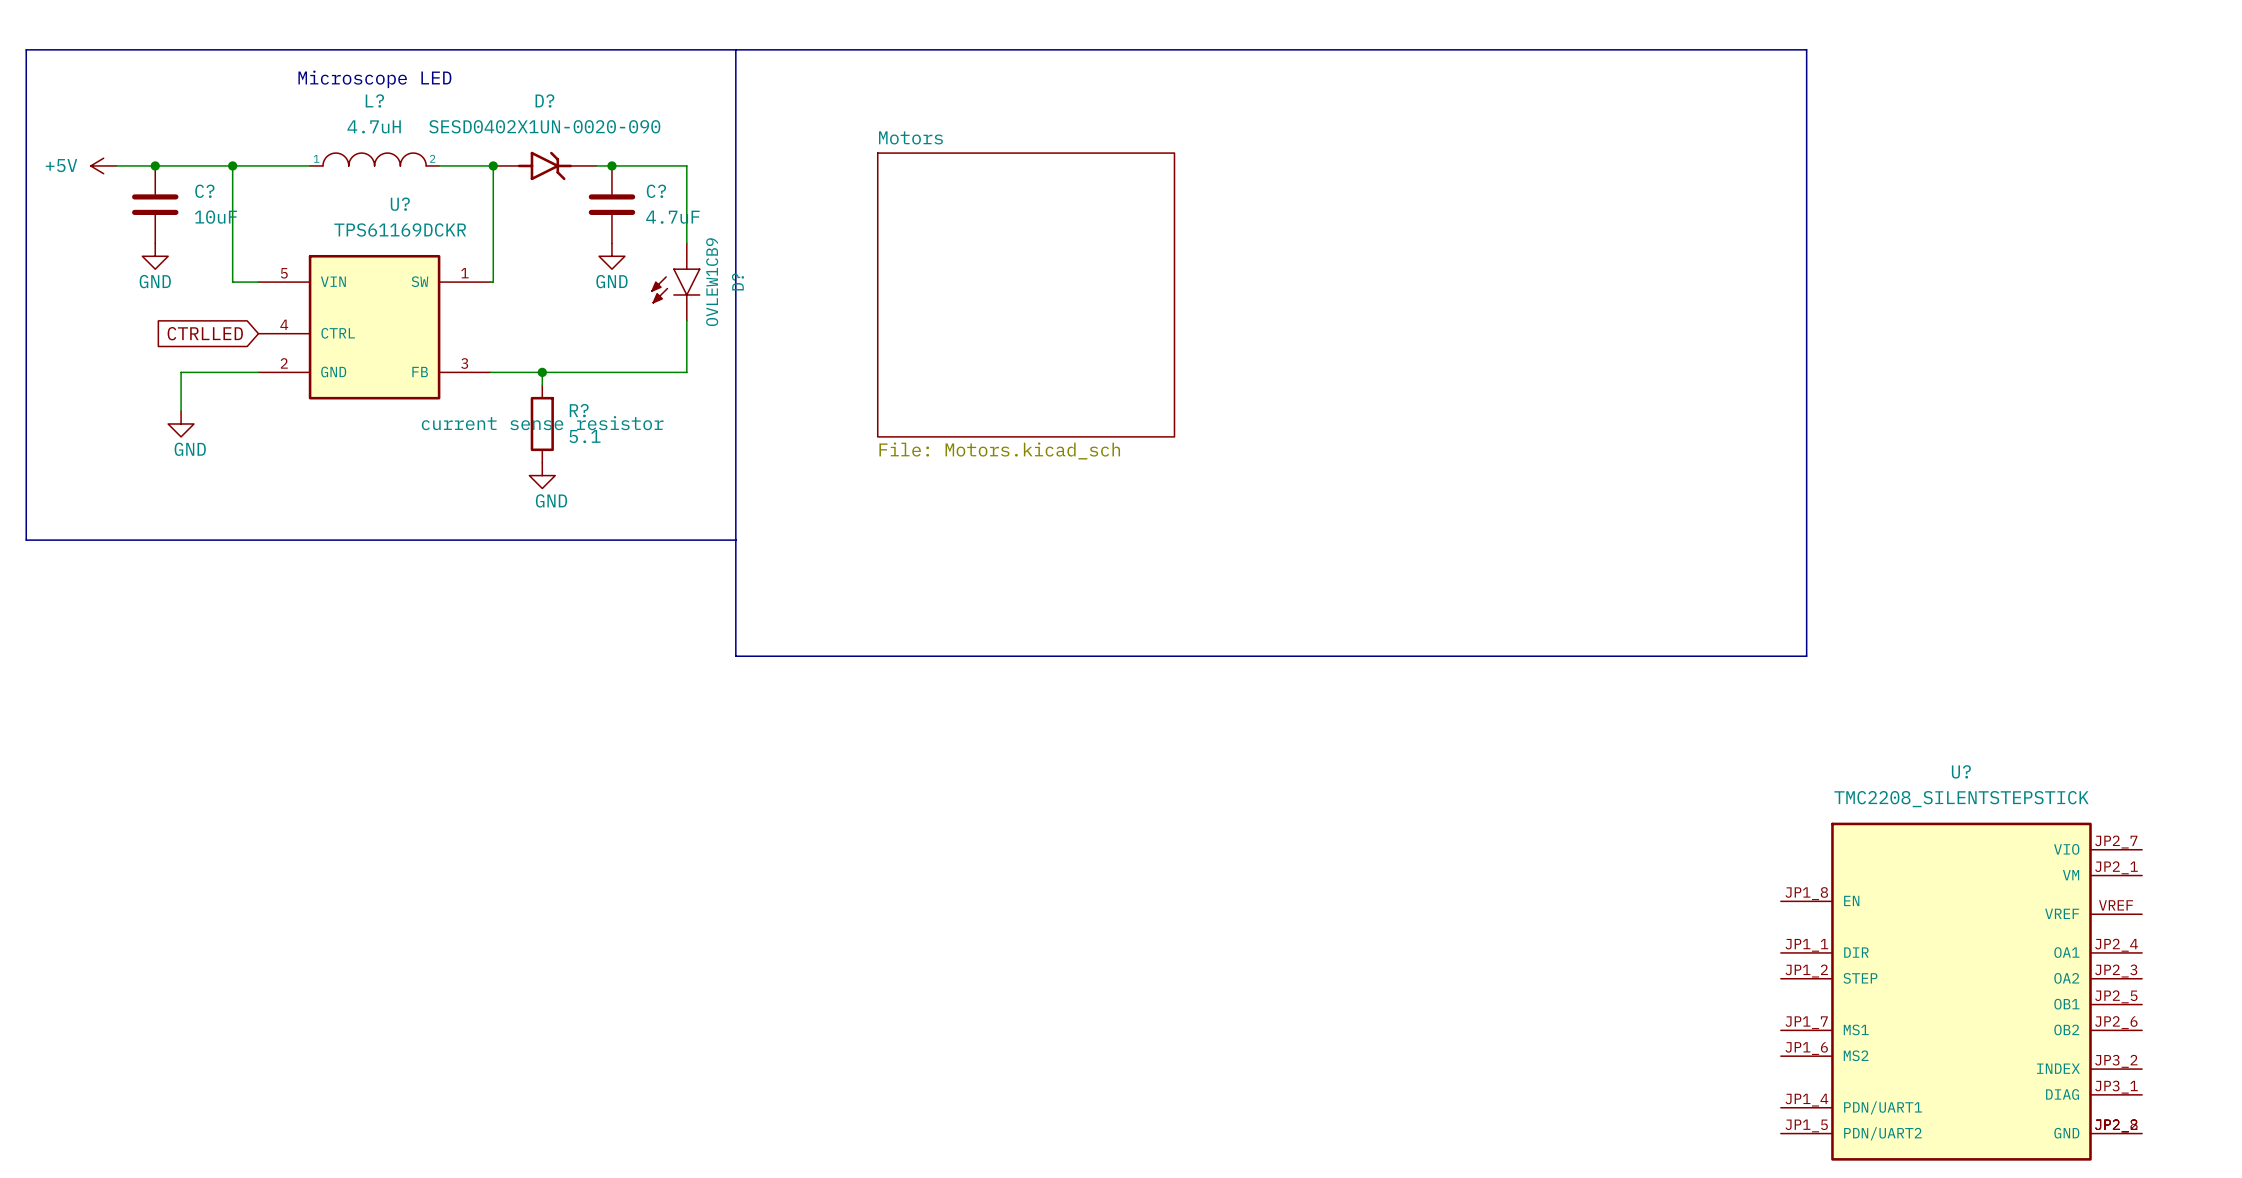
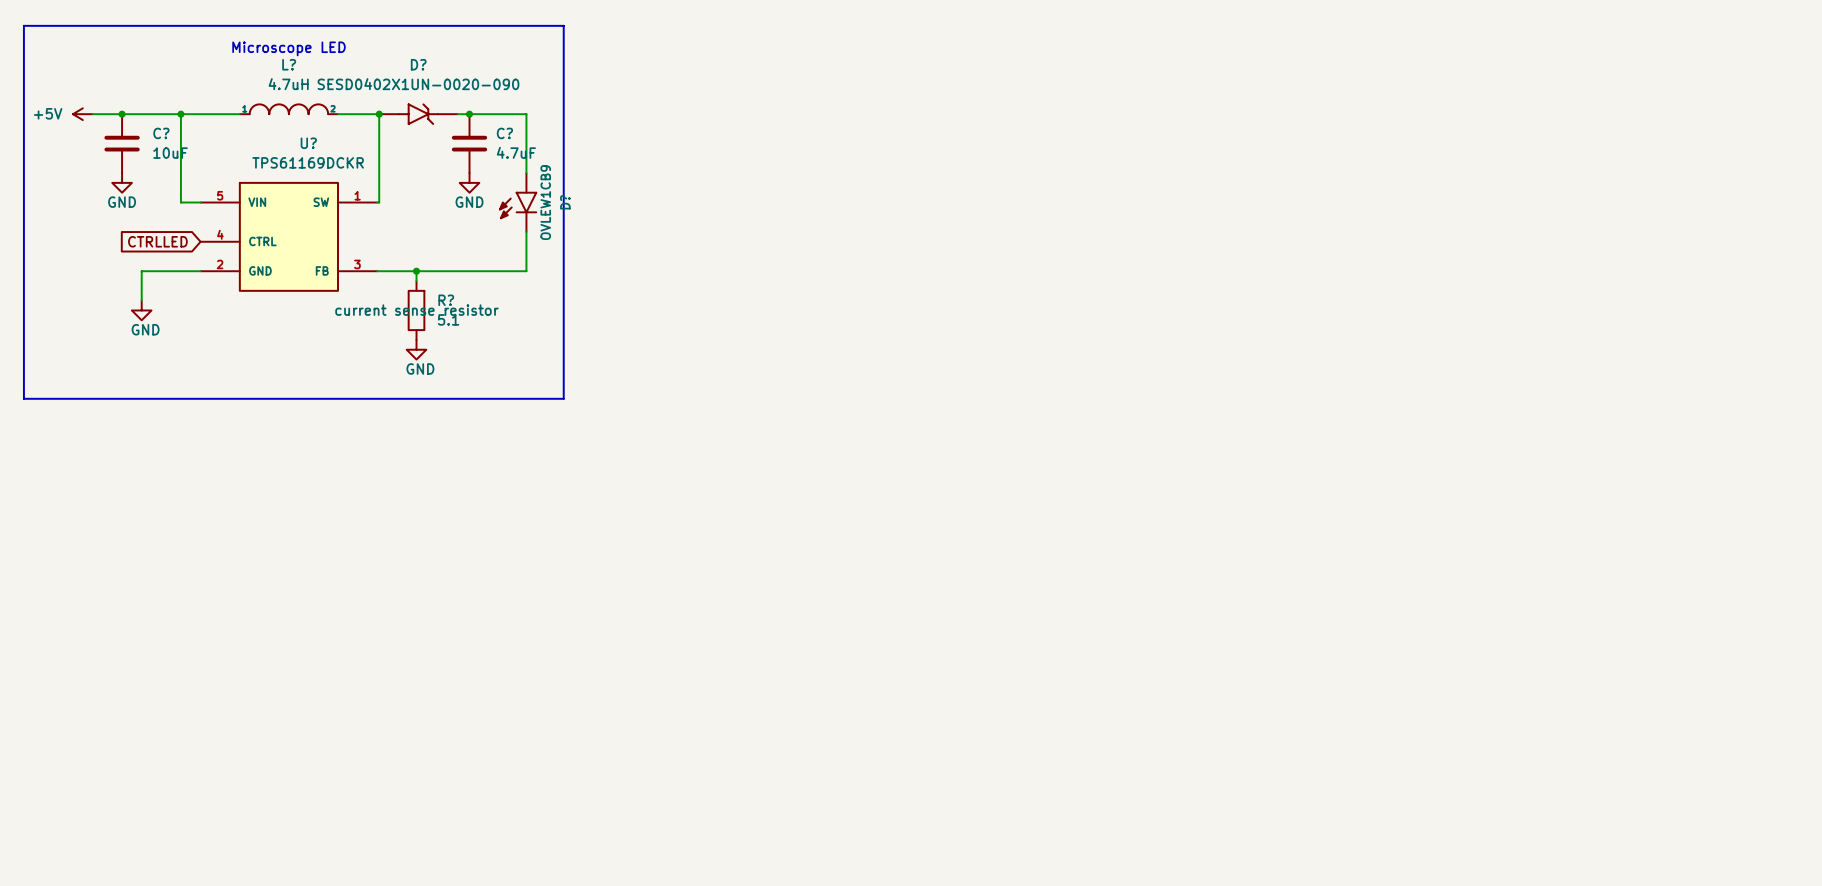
line: (735, 49) (1806, 49) (1806, 656) (735, 656) (735, 540) -> none
sheet Motors: File: Motors.kicad_sch (1026, 294) -> none
U?: TMC2208_SILENTSTEPSTICK (1961, 991) -> none

